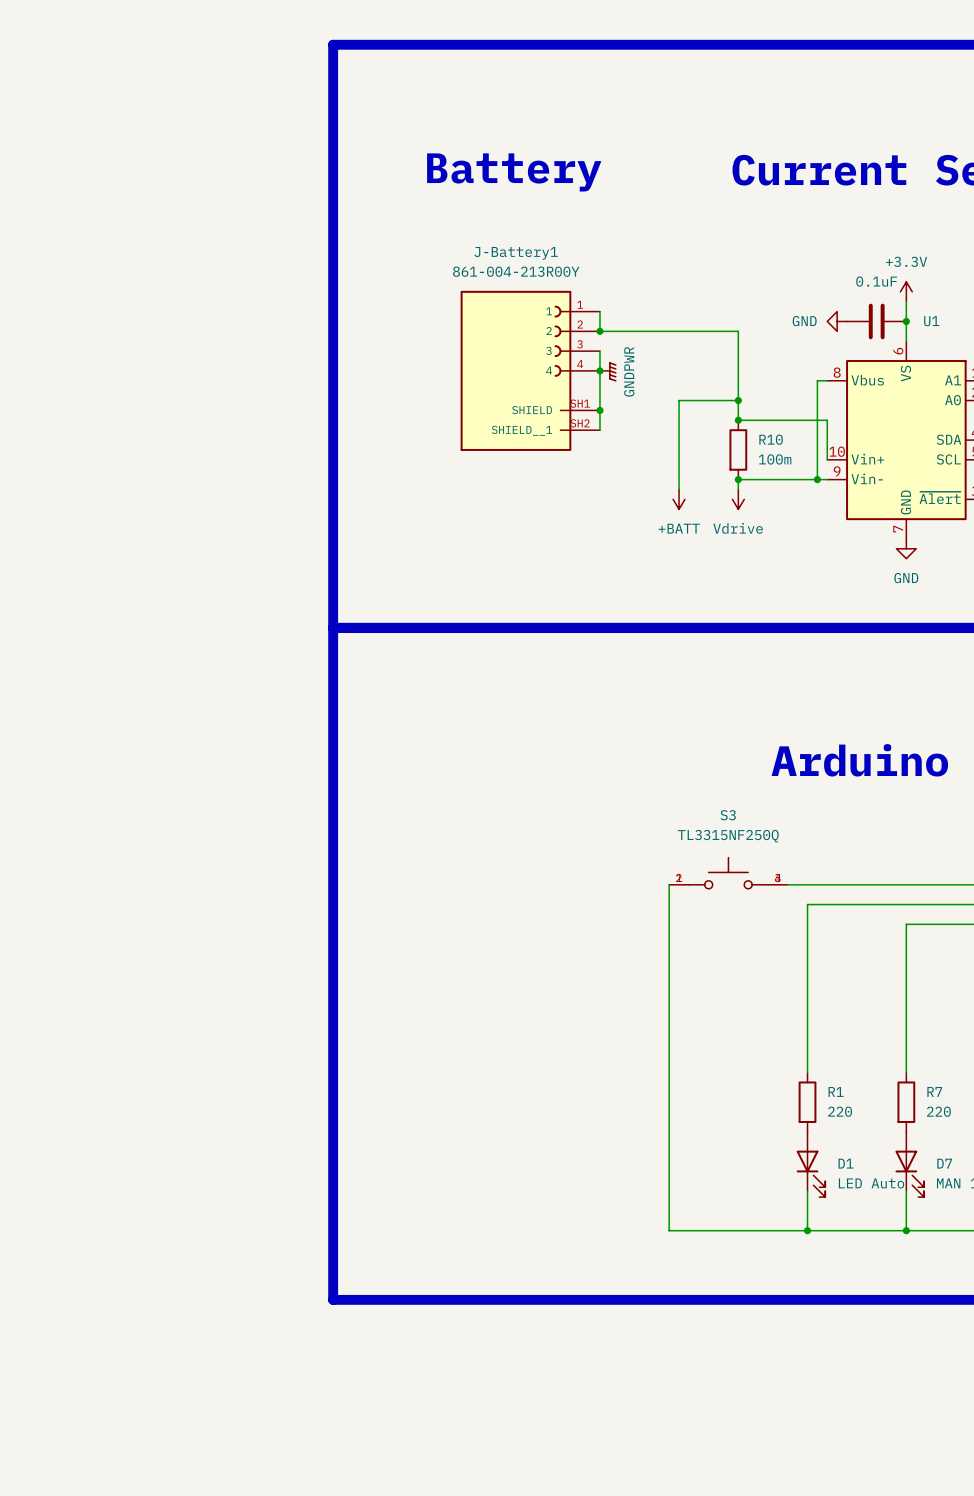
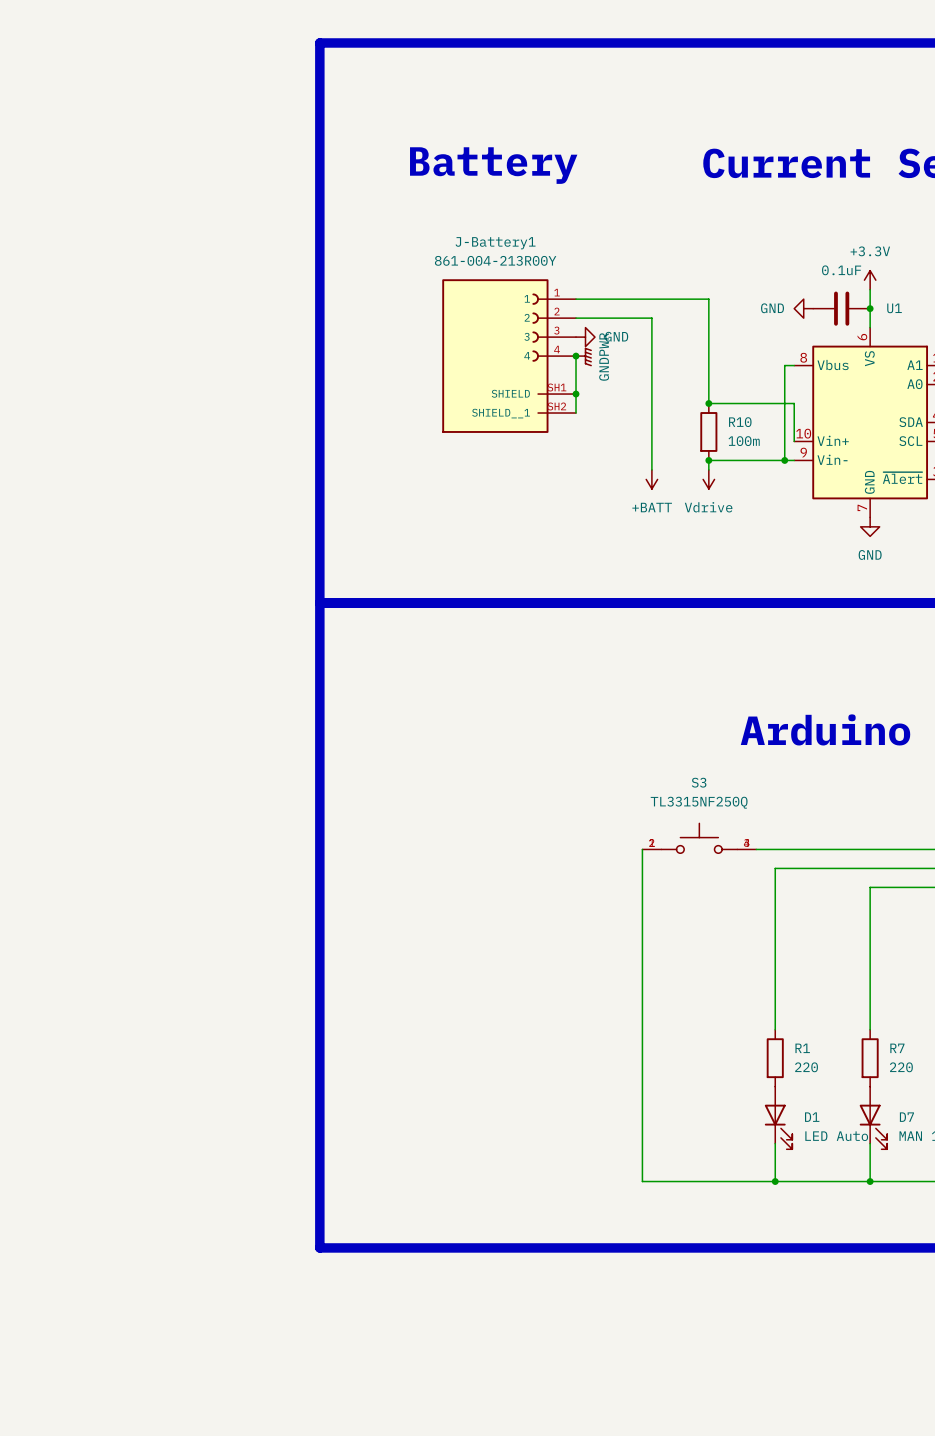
wire: (599, 311) (599, 331) -> none
junction: (599, 331) -> none
wire: (679, 331) (738, 331) -> (576, 299) (708, 299) (708, 318)
wire: (599, 351) (599, 370) -> none
power symbol: none -> GND (585, 337)
wire: (679, 400) (738, 400) -> (651, 384) (651, 318)
junction: (738, 400) -> none

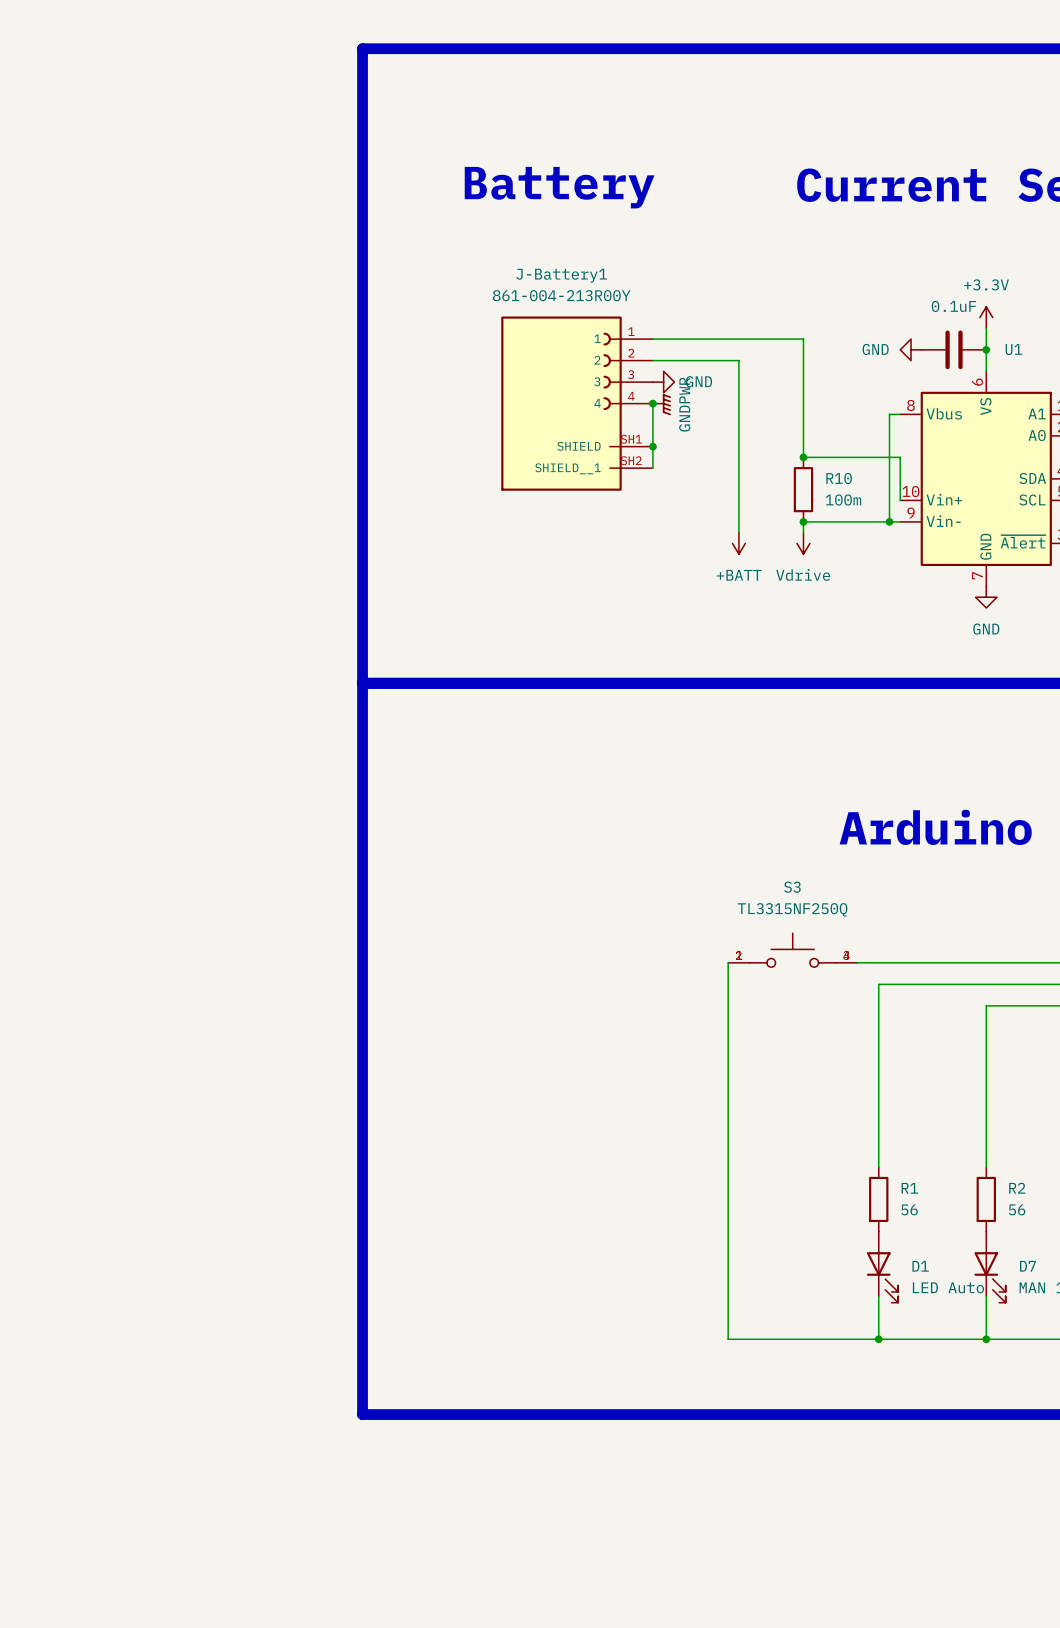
R7 name: R7 (897, 1048) -> R2 (1017, 1188)
R1 value: 220 (806, 1067) -> 56 (909, 1209)
R7 value: 220 (901, 1067) -> 56 (1017, 1209)

